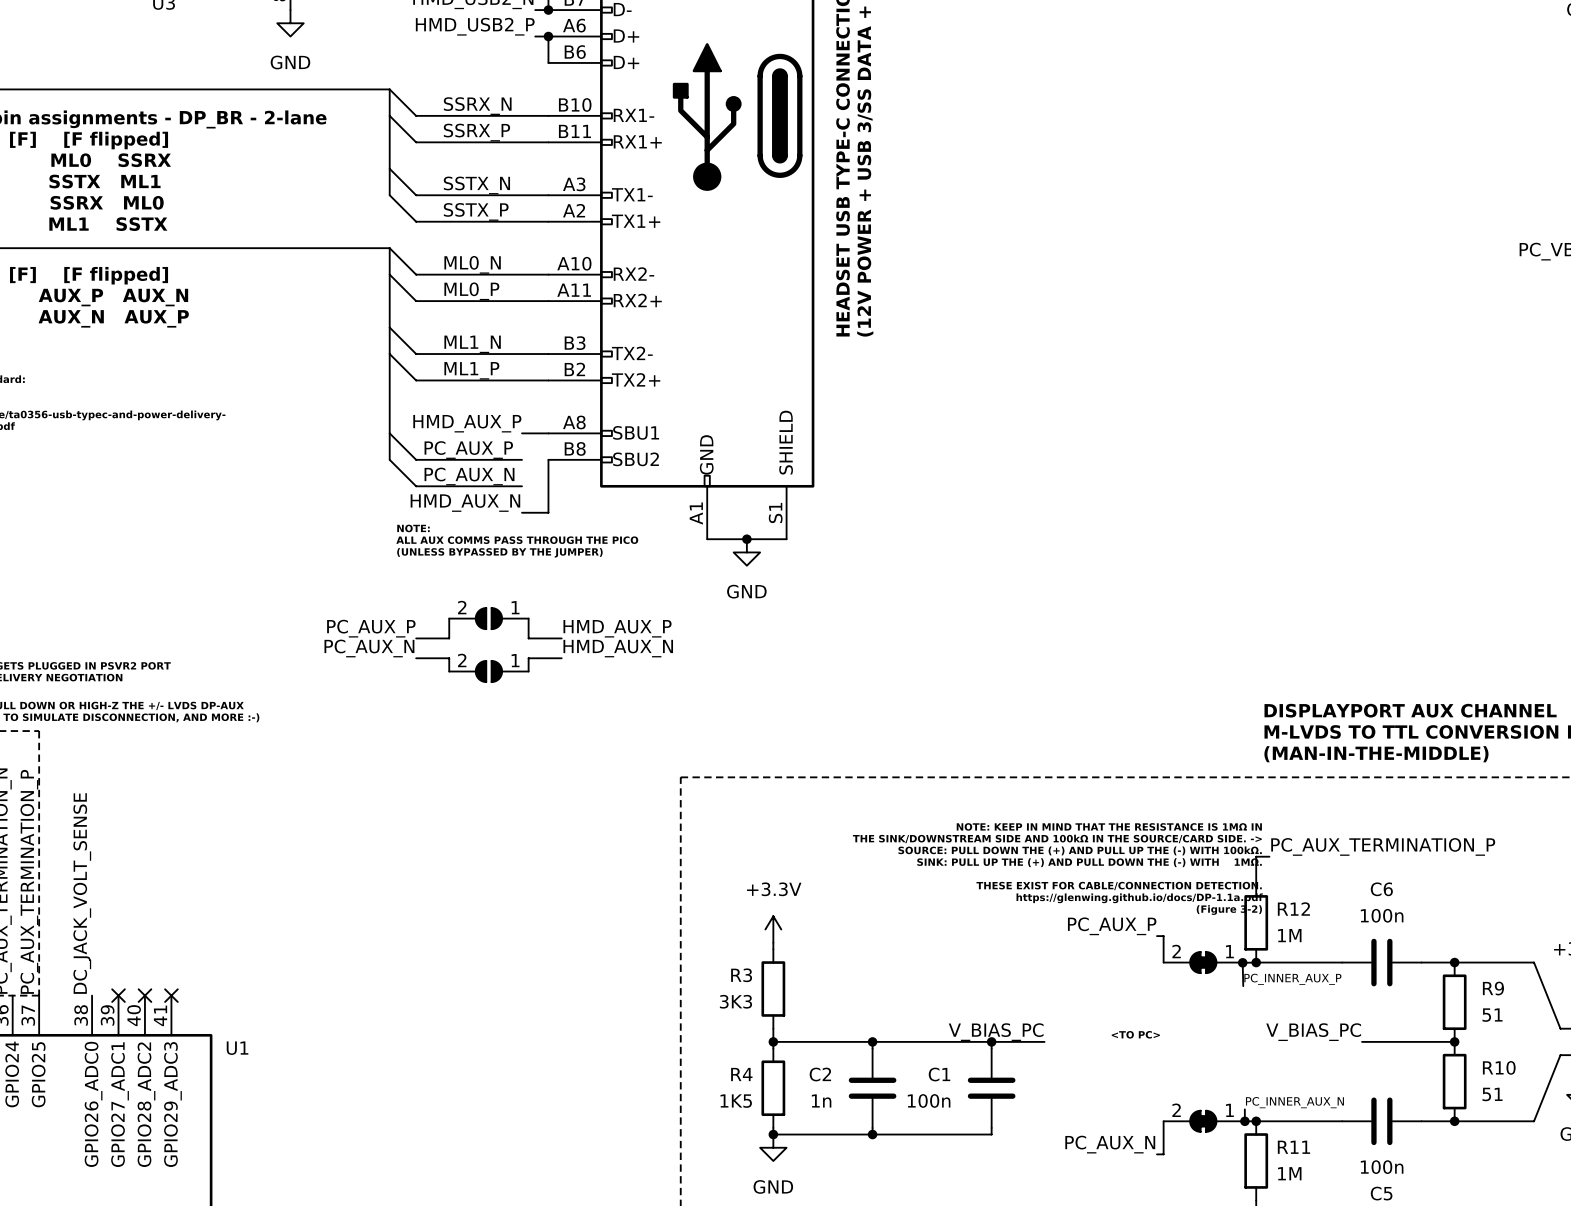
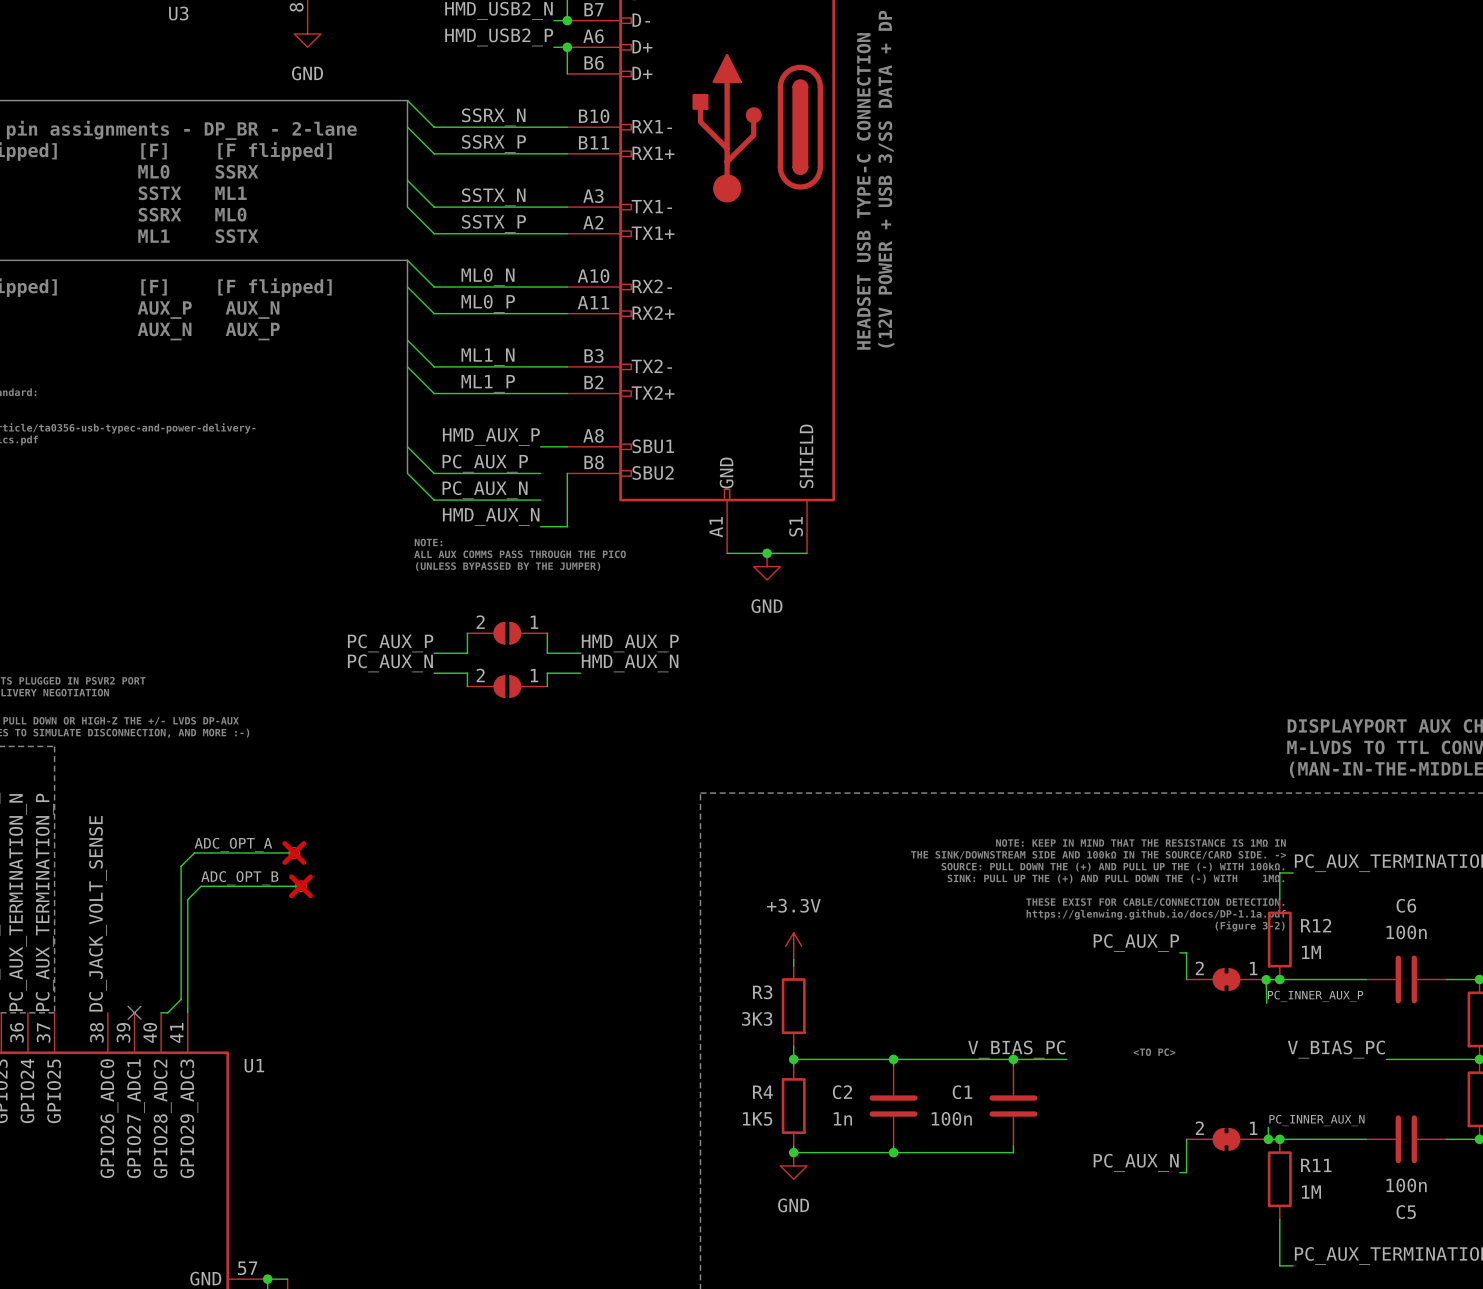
label: none -> ADC_OPT_A (233, 844)
wire: none -> (294, 852) (194, 852) (181, 866) (181, 999) (167, 1012) (161, 1012)
part: none -> (294, 852)
label: none -> ADC_OPT_B (239, 878)
wire: none -> (300, 886) (201, 886) (187, 899) (187, 1012)
part: none -> (300, 886)
no-connect mark: (144, 995) -> none
no-connect mark: (171, 995) -> none

